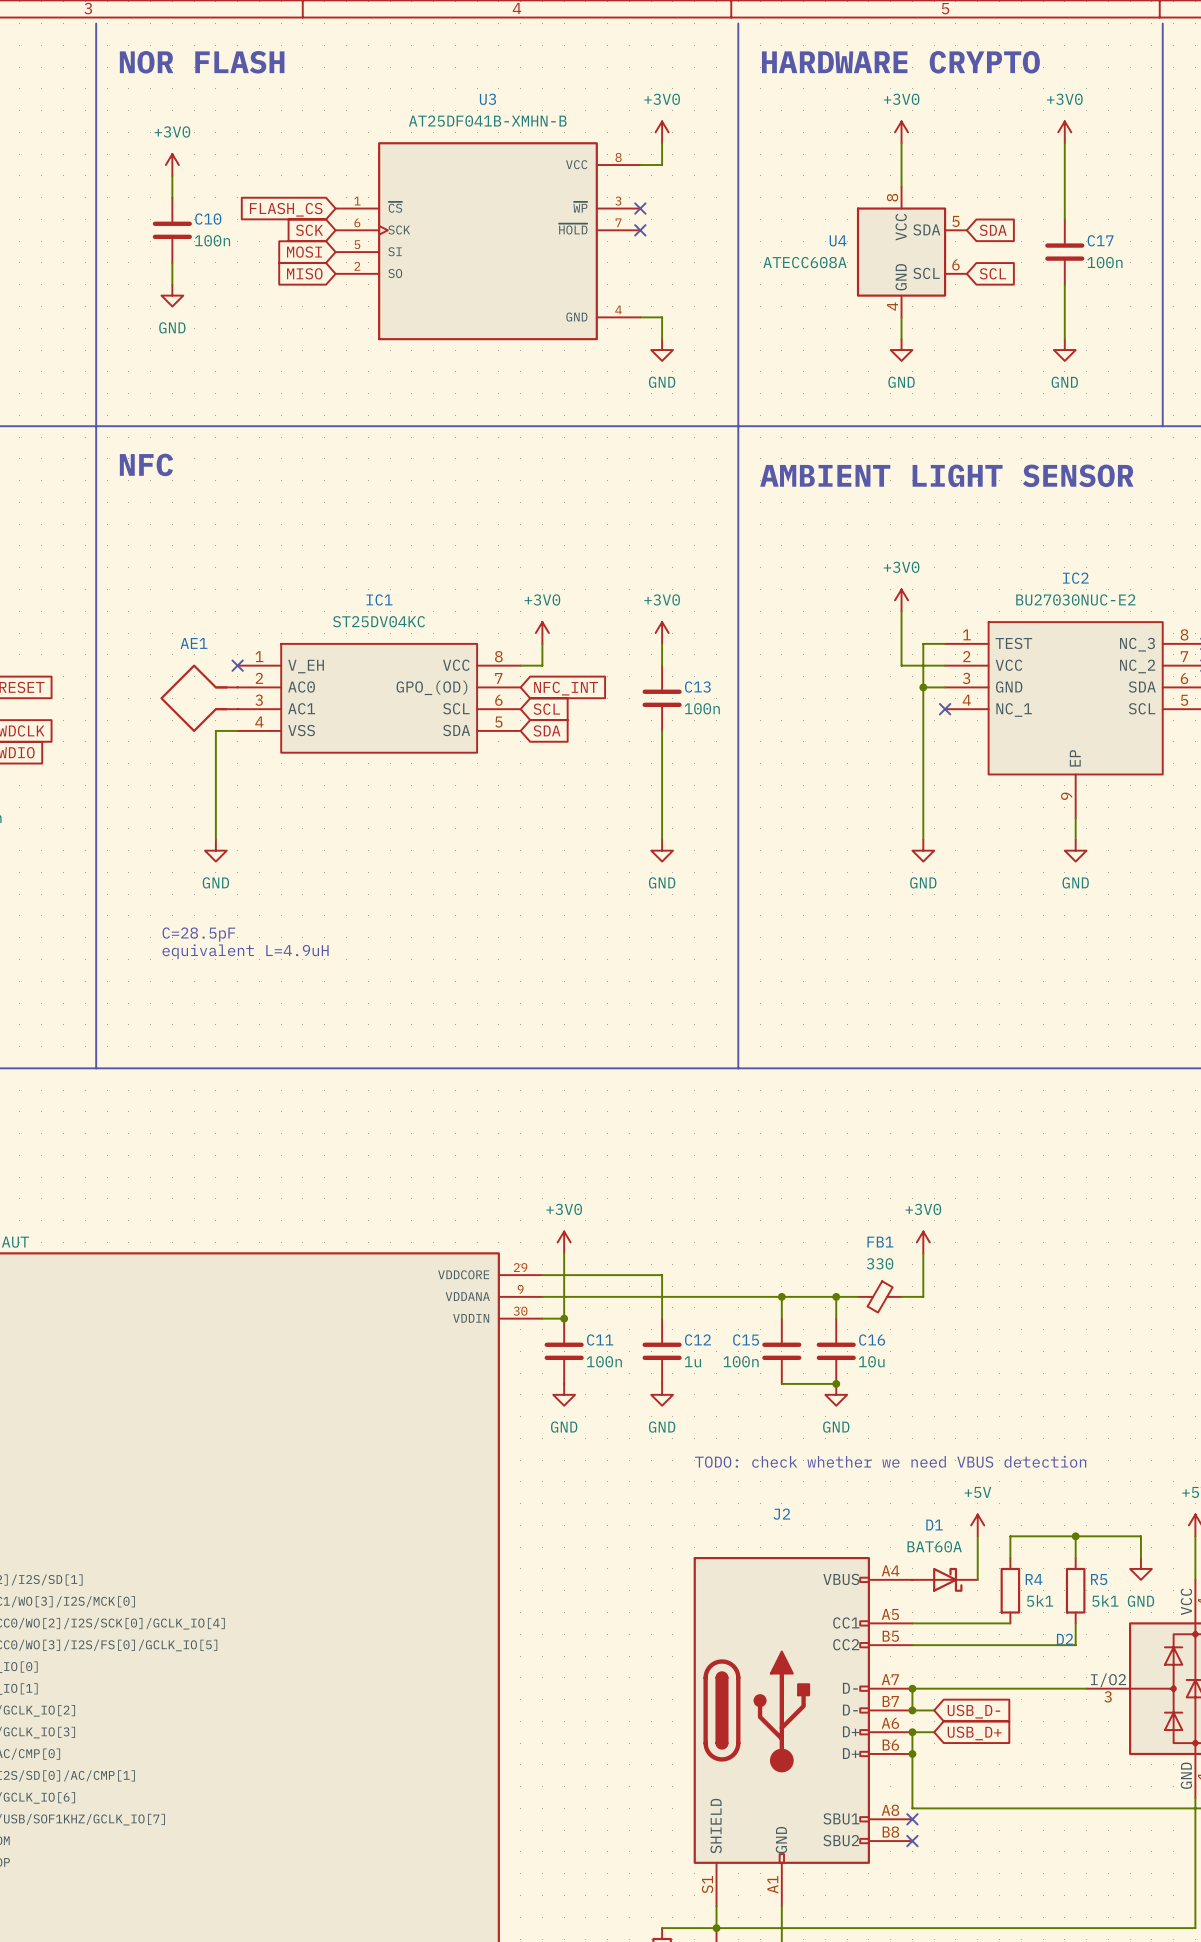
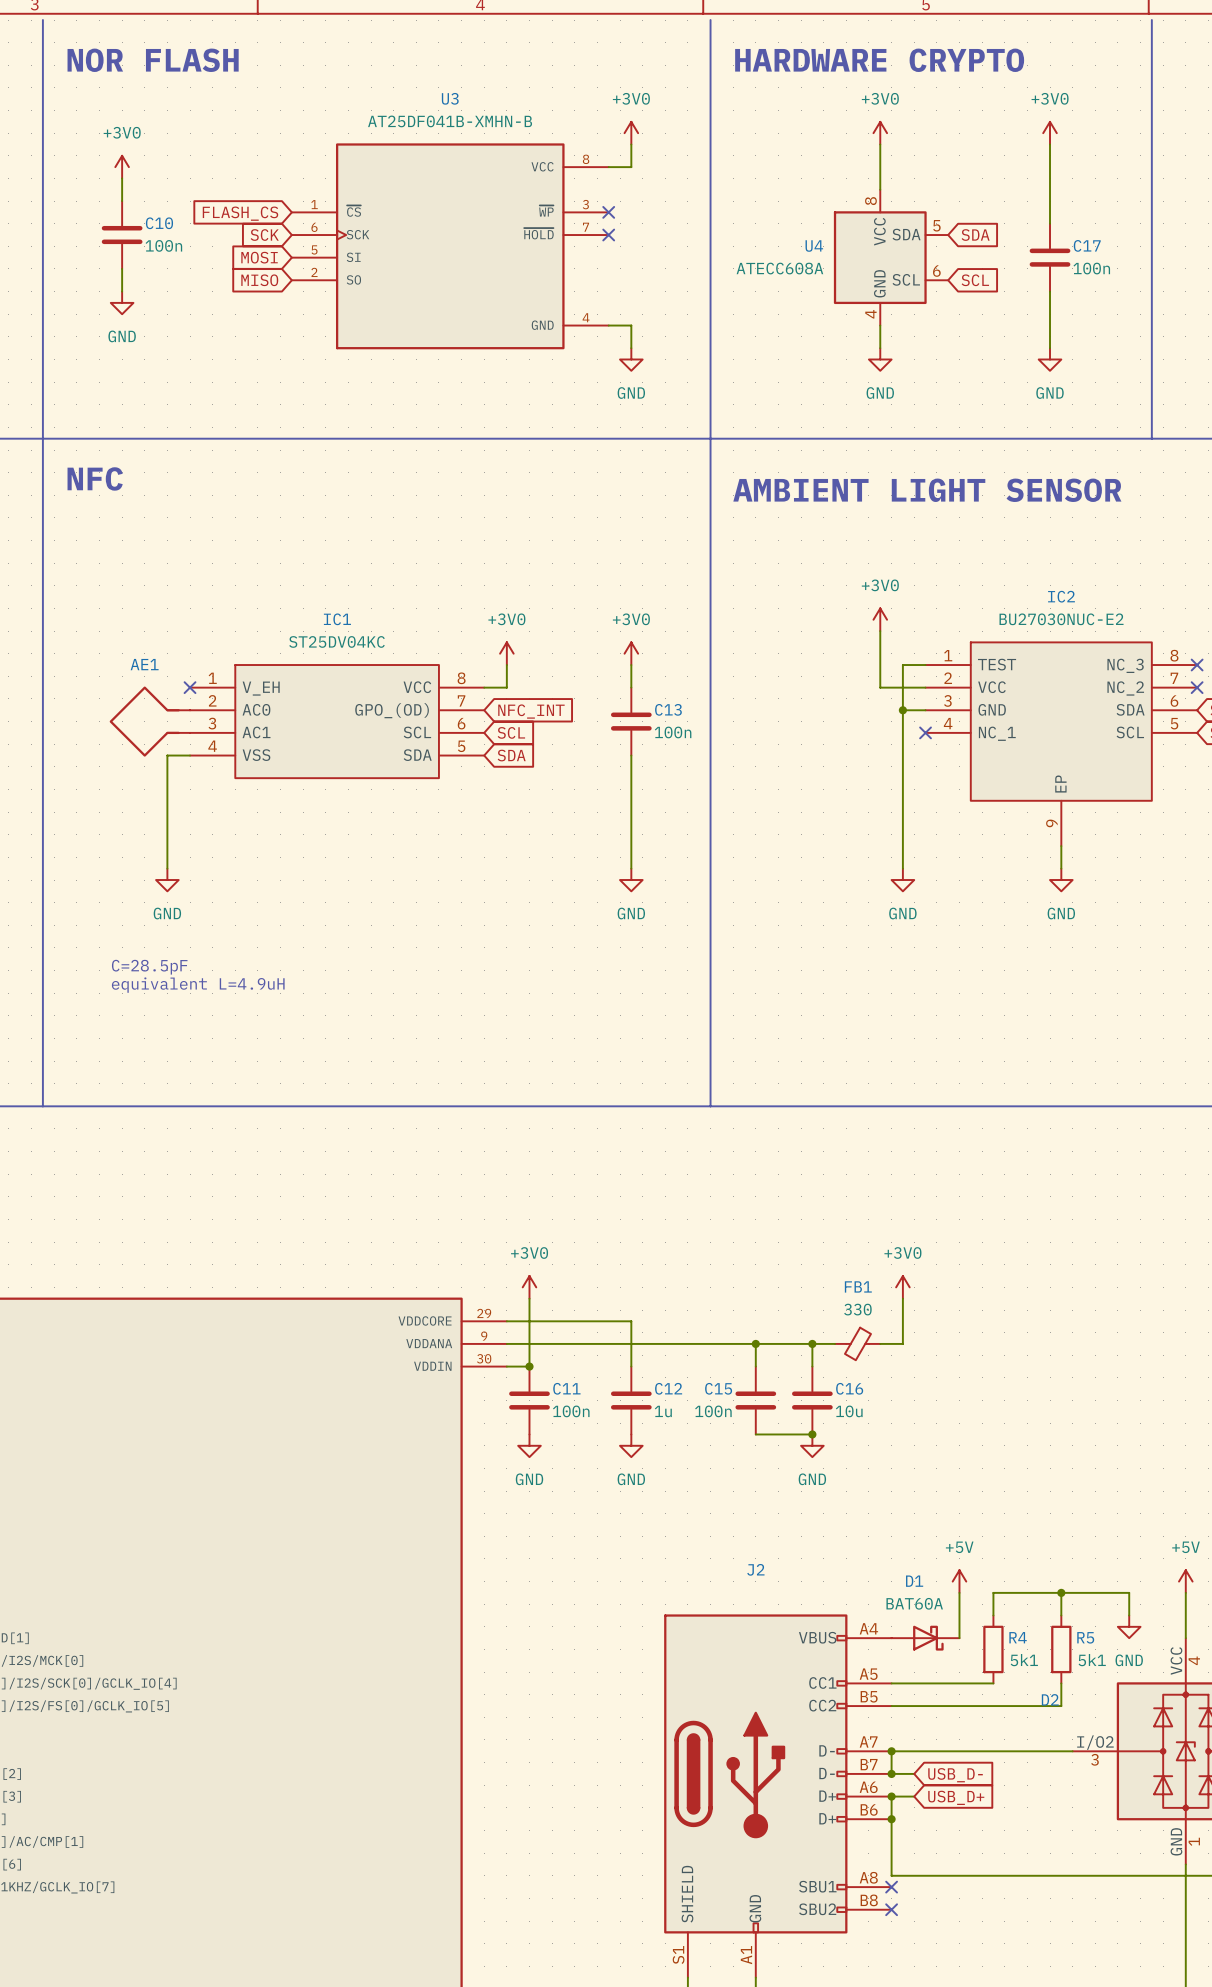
text: TODO: check whether we need VBUS detection (890, 1461) -> none

